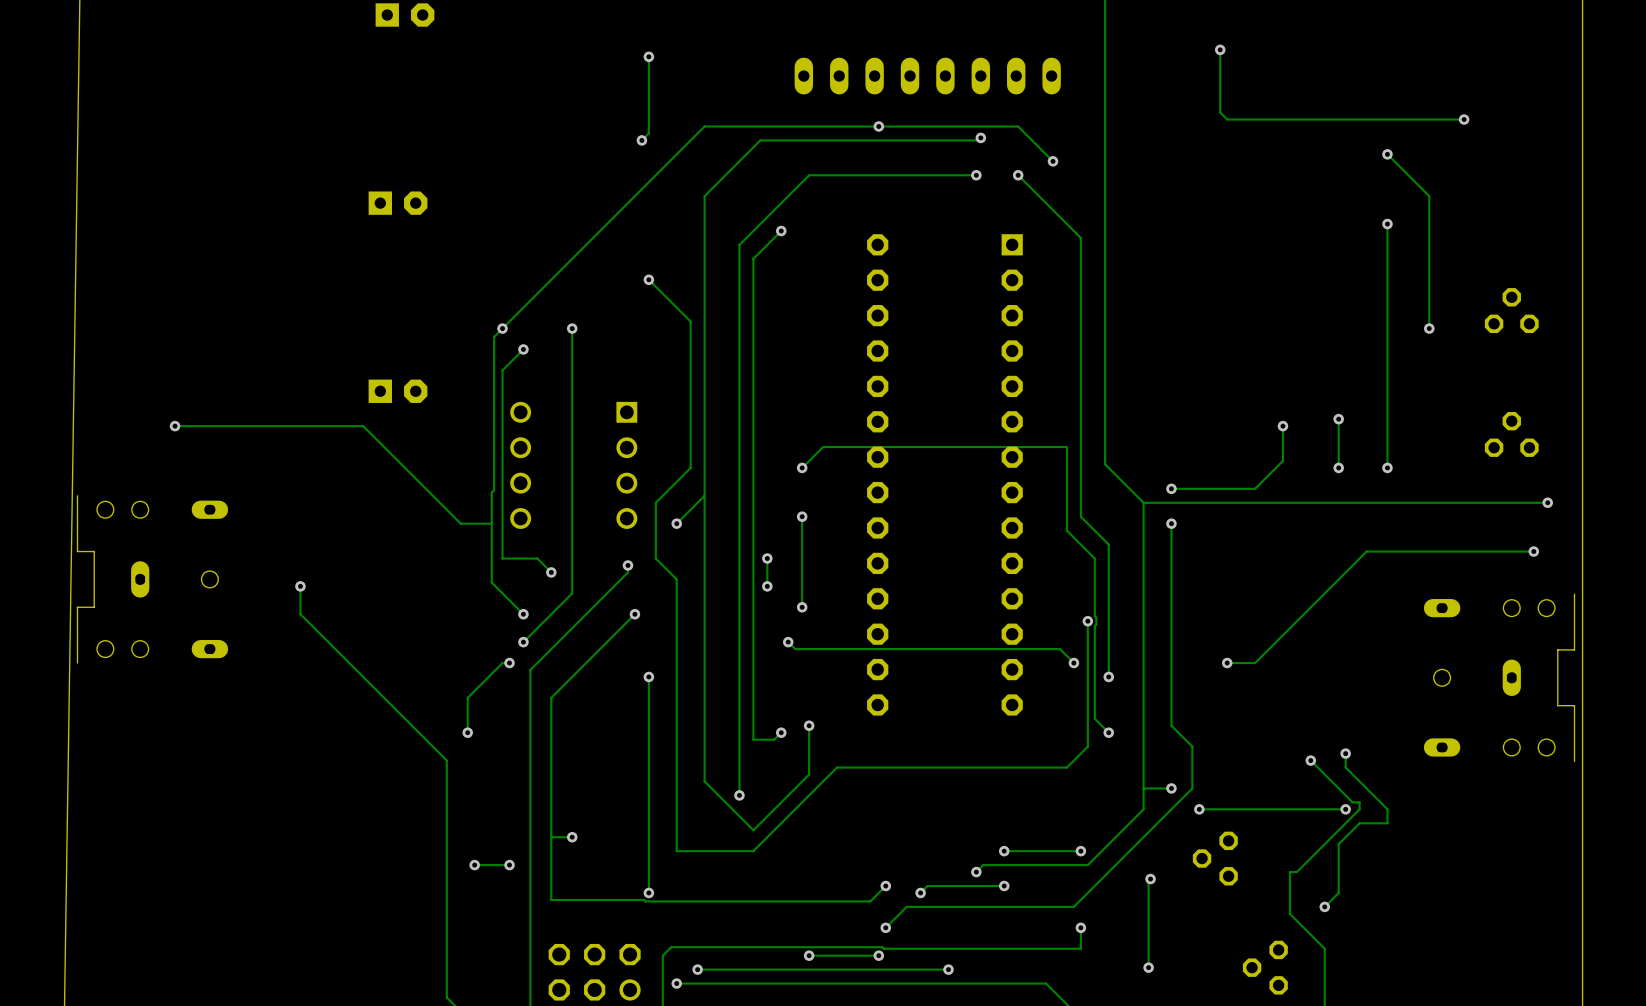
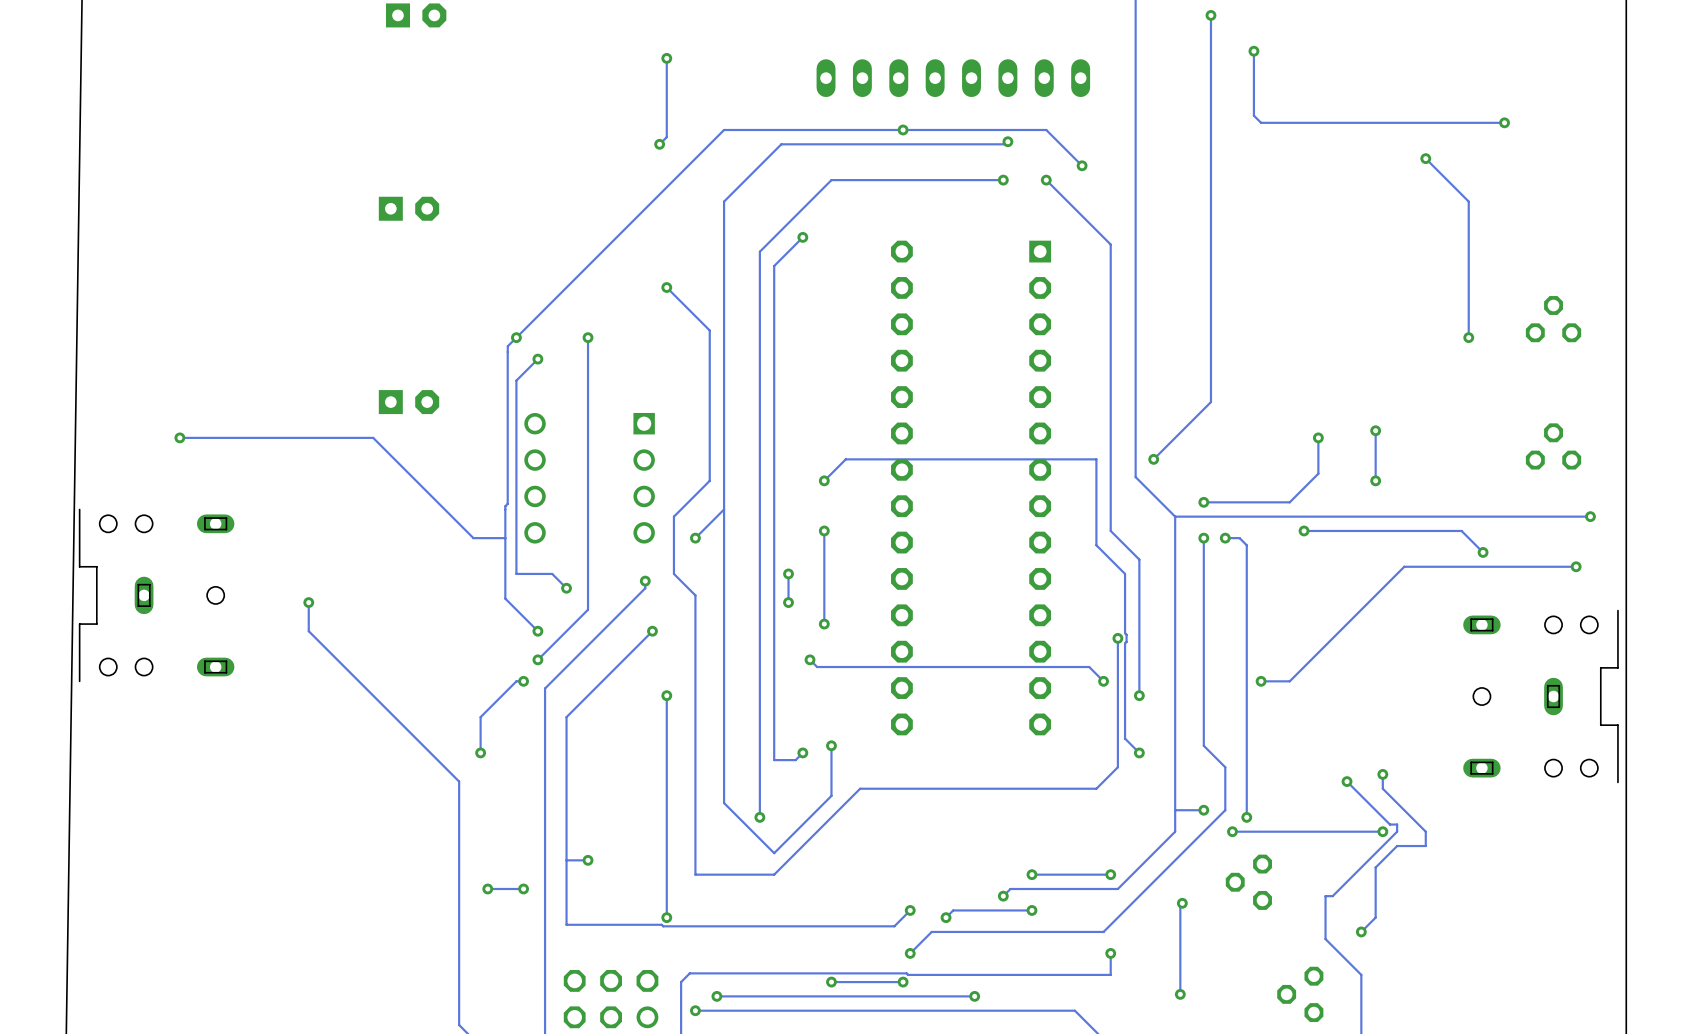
track: none -> (1210, 15) (1210, 402) (1153, 459)
via: none -> (1210, 15)
track: (1387, 224) (1387, 467) -> none
via: (1387, 224) -> none
via: none -> (1153, 459)
via: (1387, 467) -> none
track: none -> (1304, 530) (1461, 530) (1483, 552)
via: none -> (1304, 530)
track: none -> (1225, 538) (1239, 538) (1246, 545) (1246, 817)
via: none -> (1225, 538)
via: none -> (1483, 552)
via: none -> (1246, 817)

